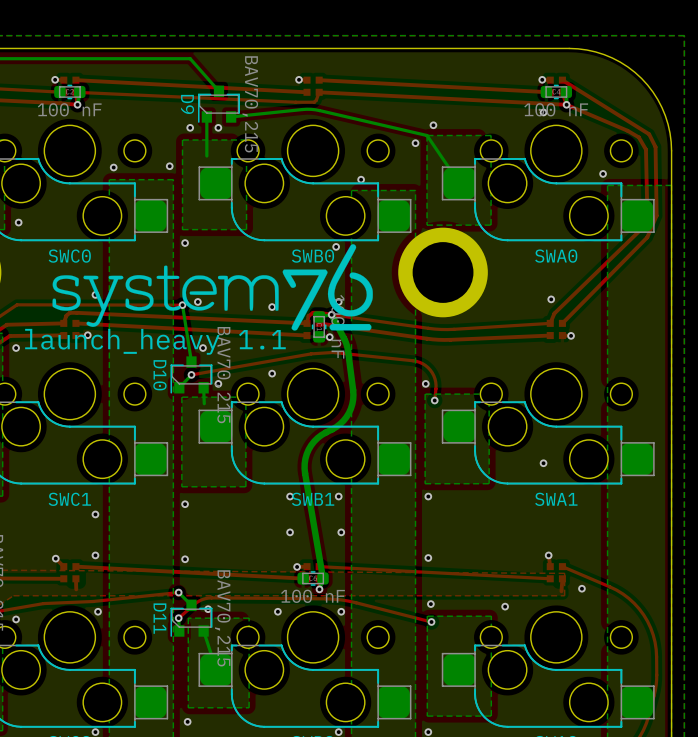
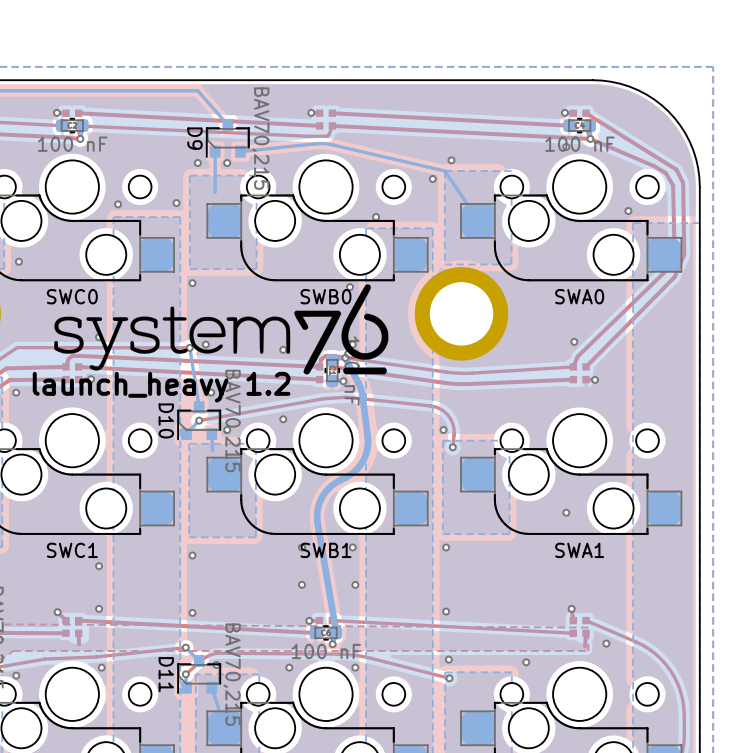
text: launch_heavy 1.1 (155, 341) -> launch_heavy 1.2 (161, 387)

